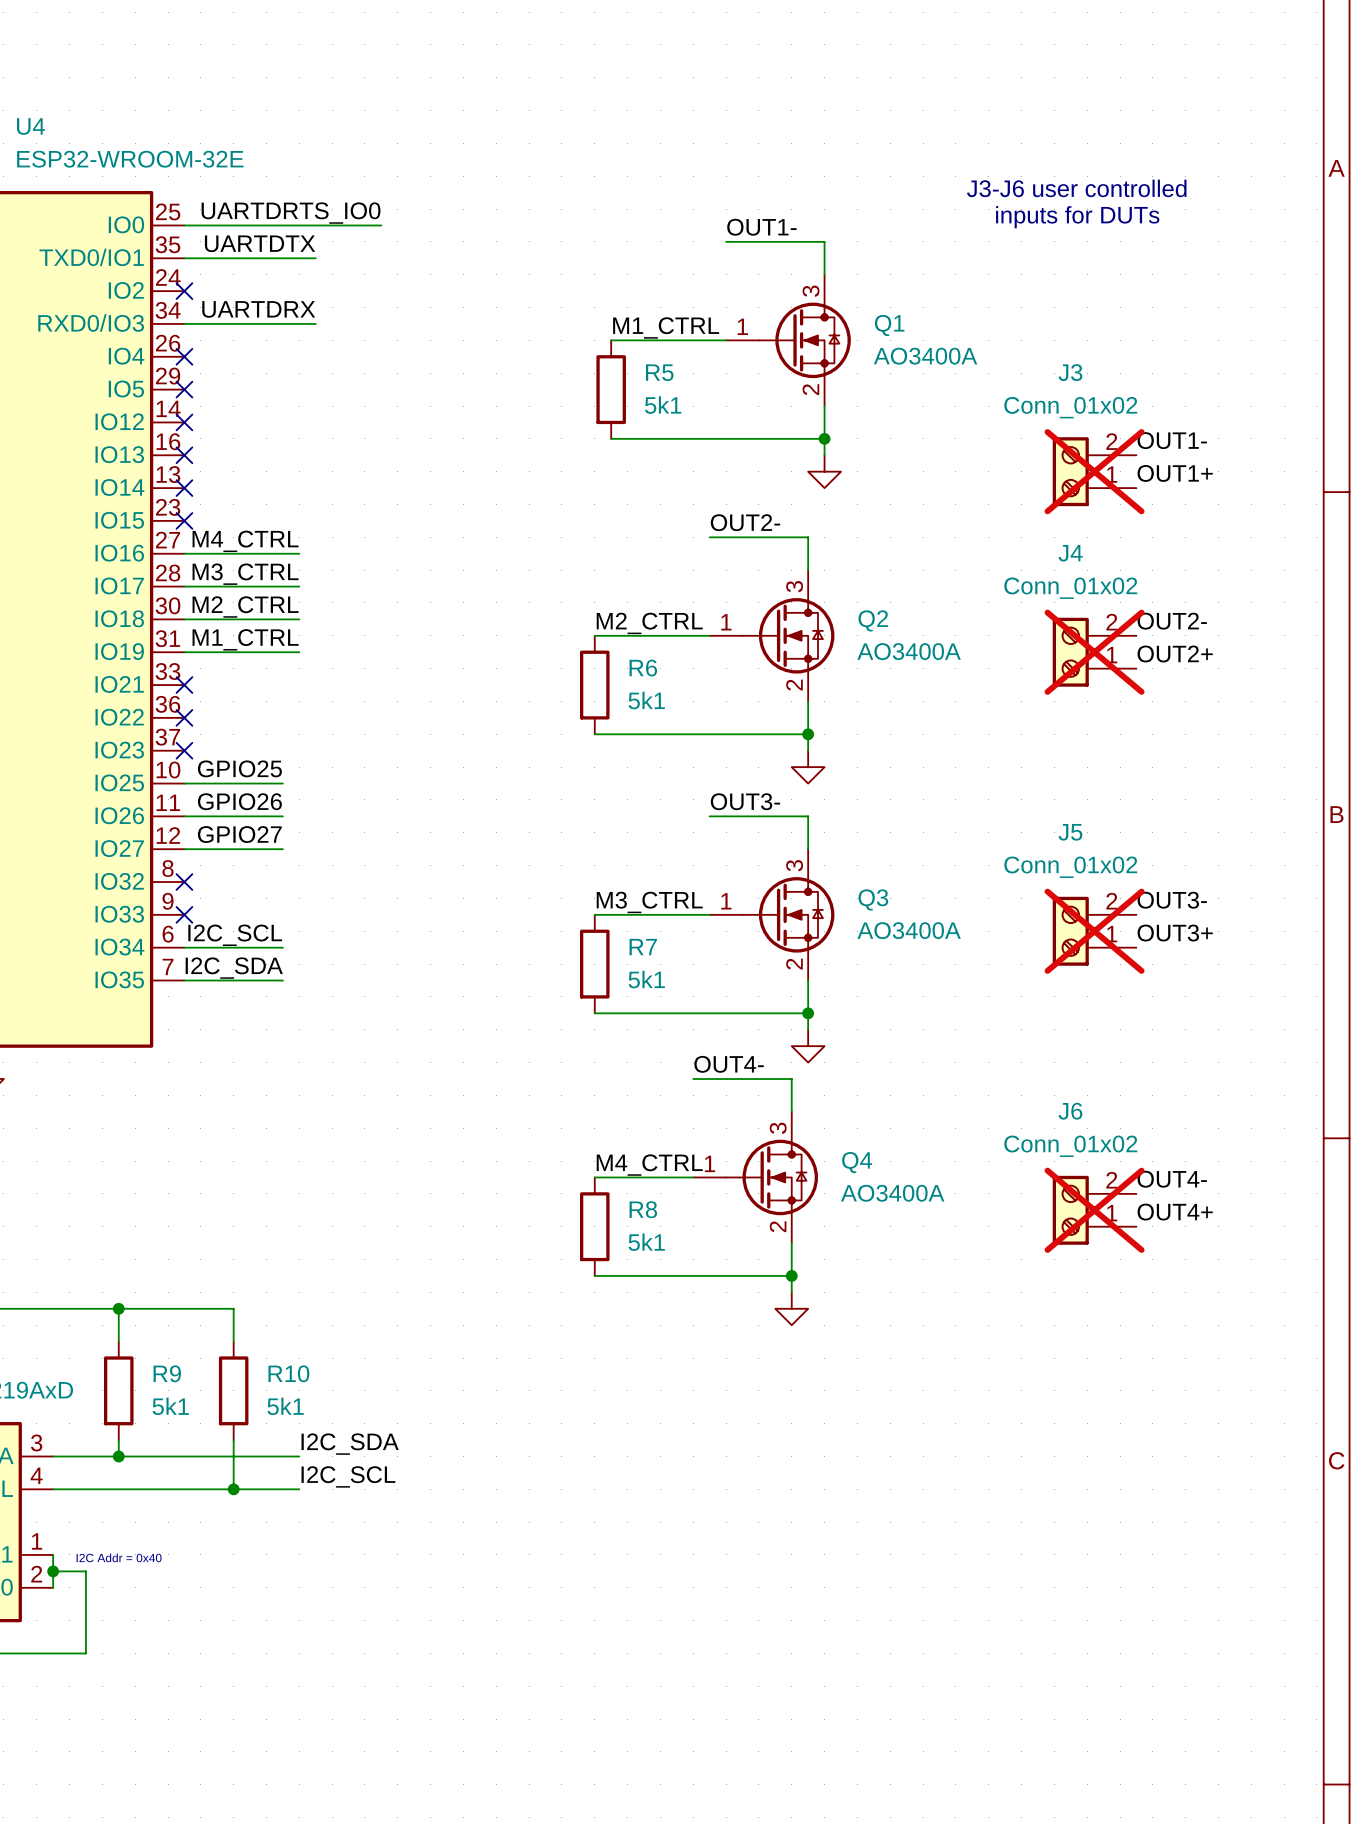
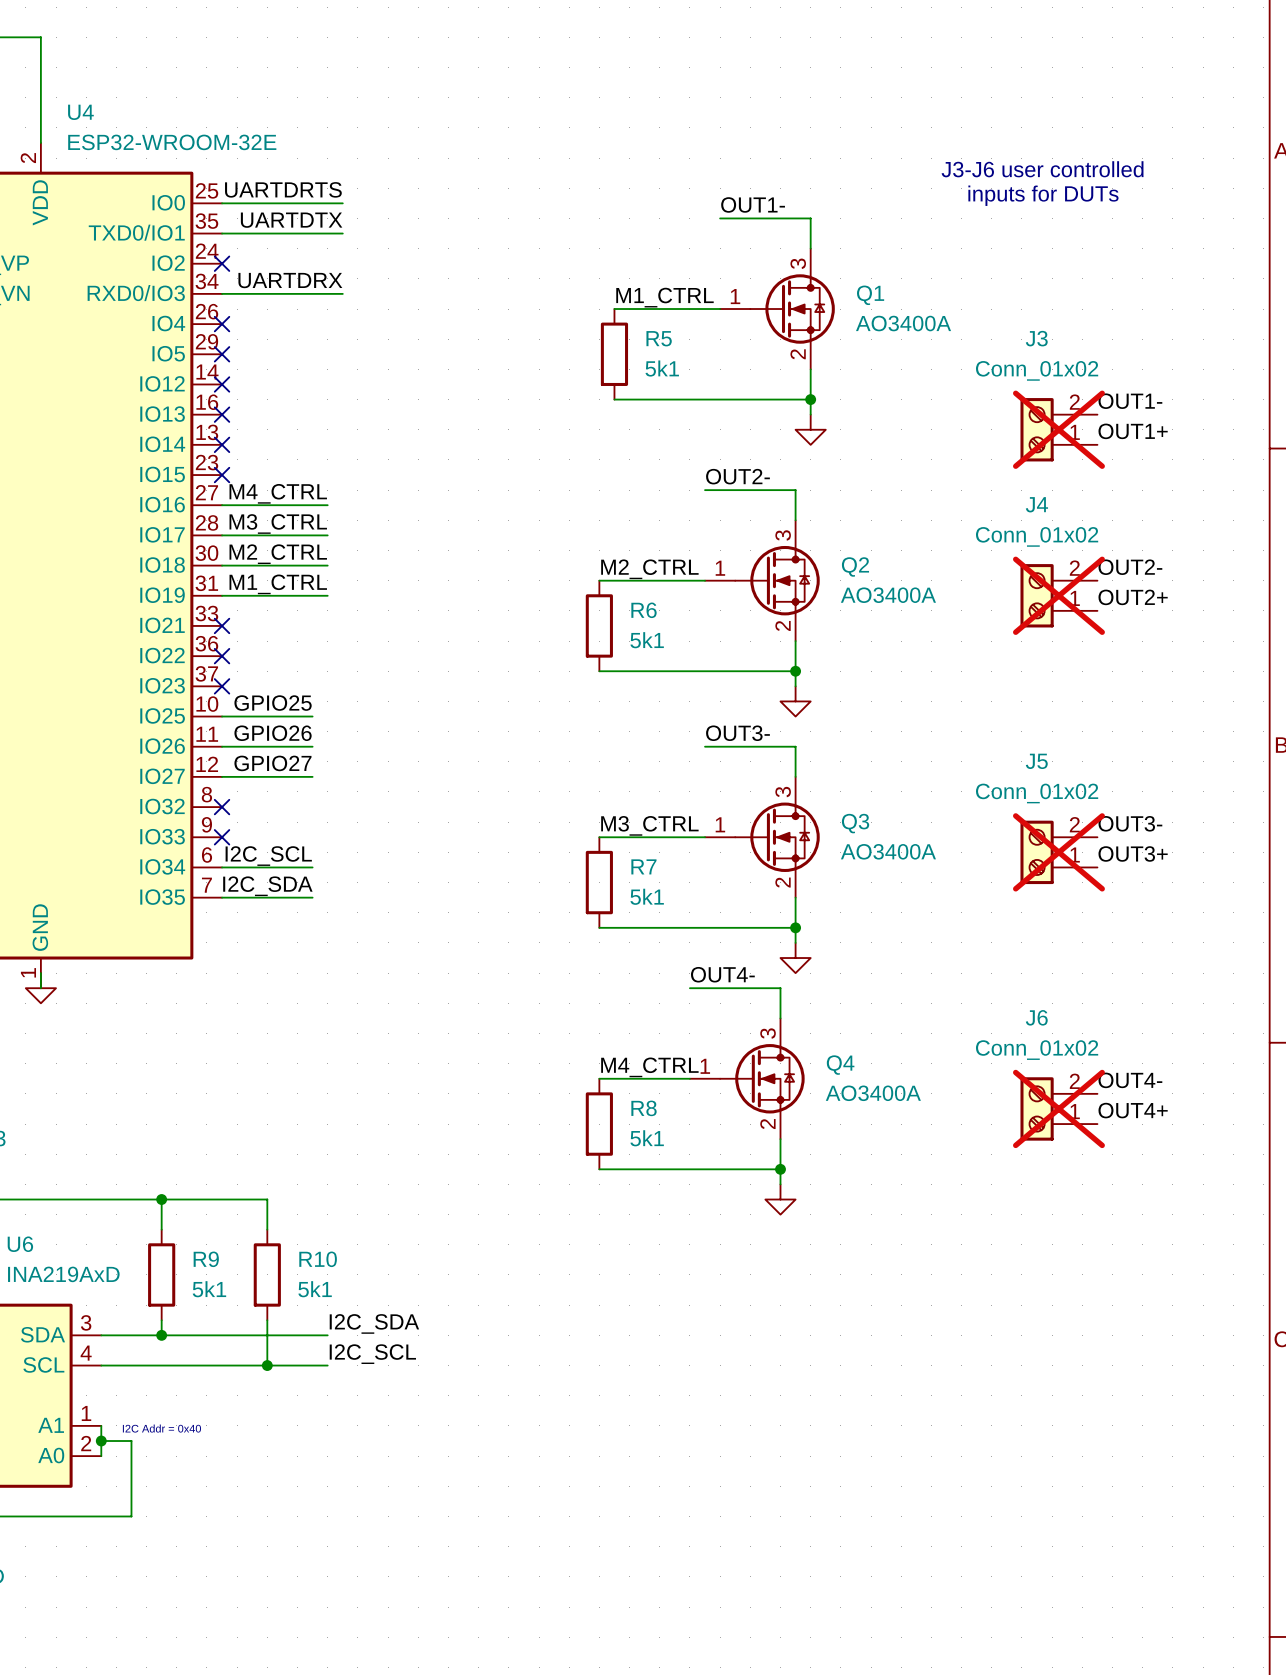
label: UARTDRTS_IO0 (291, 213) -> UARTDRTS (283, 189)
wire: (315, 225) (381, 225) -> none

